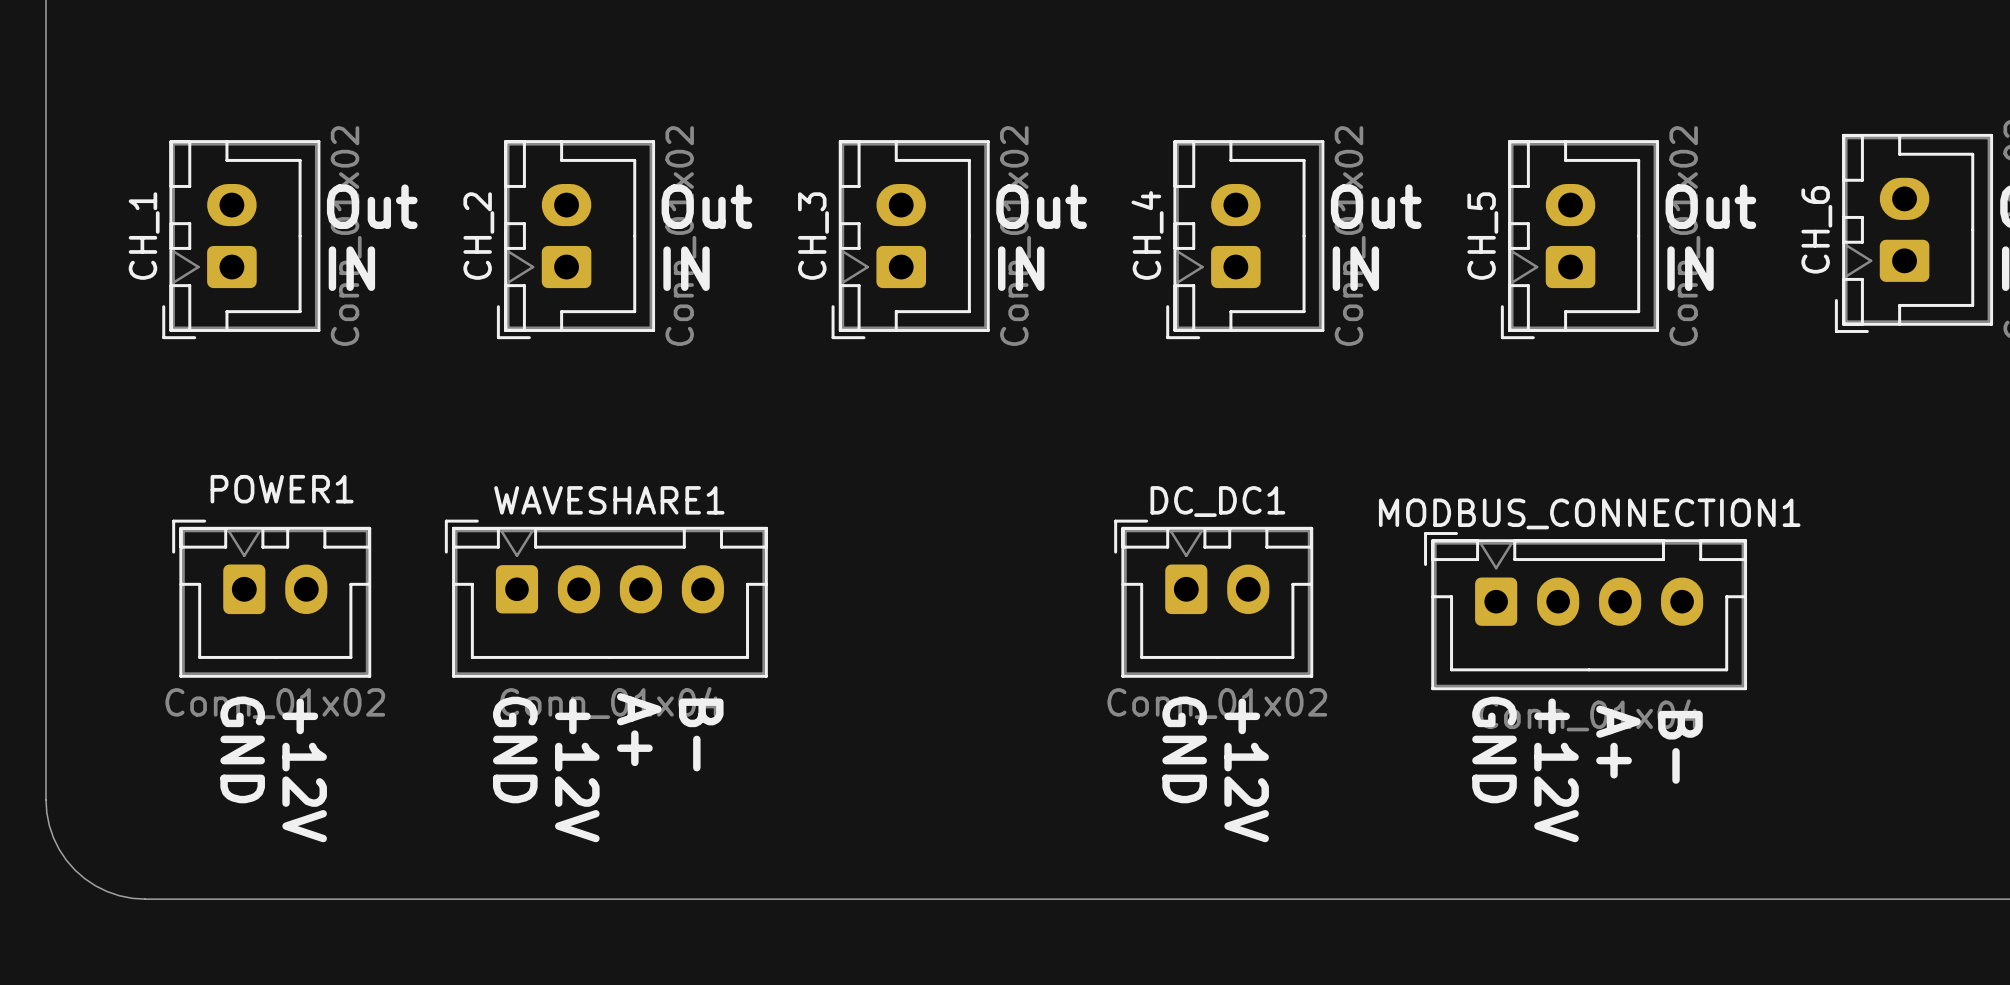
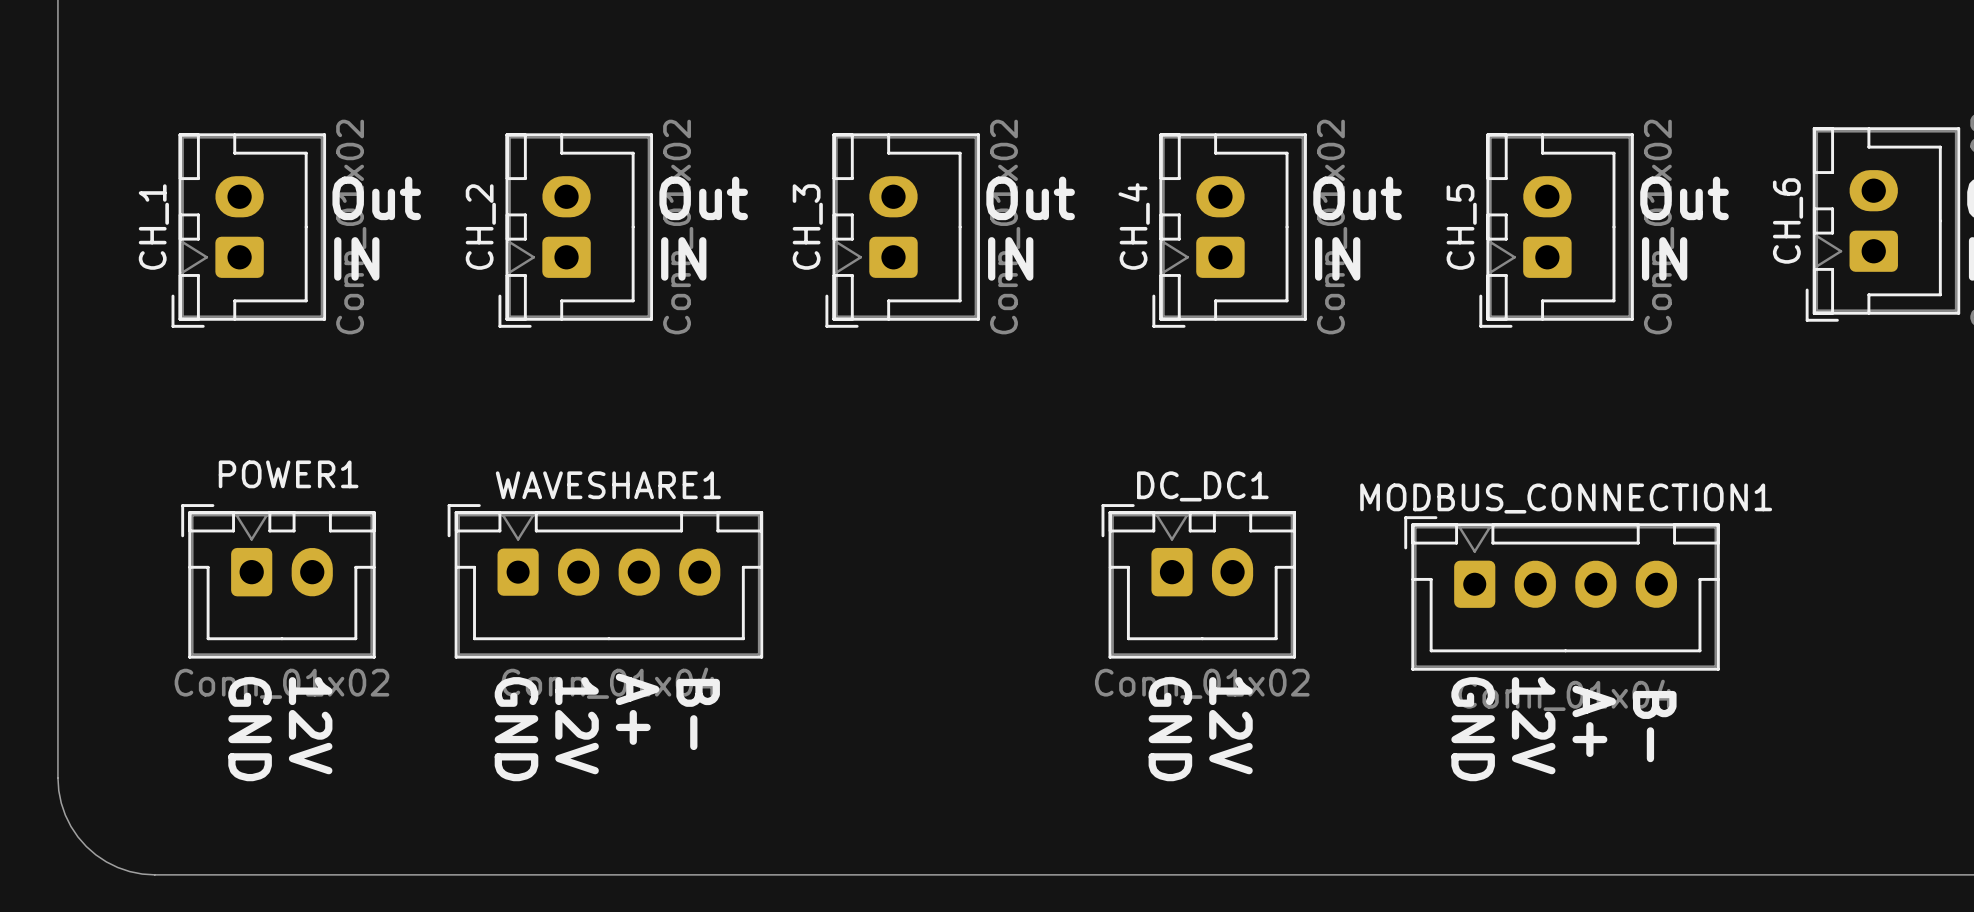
text: +12V (304, 770) -> 12V (310, 725)
text: +12V (577, 770) -> 12V (577, 725)
text: +12V (1246, 770) -> 12V (1230, 725)
text: +12V (1556, 770) -> 12V (1533, 725)

